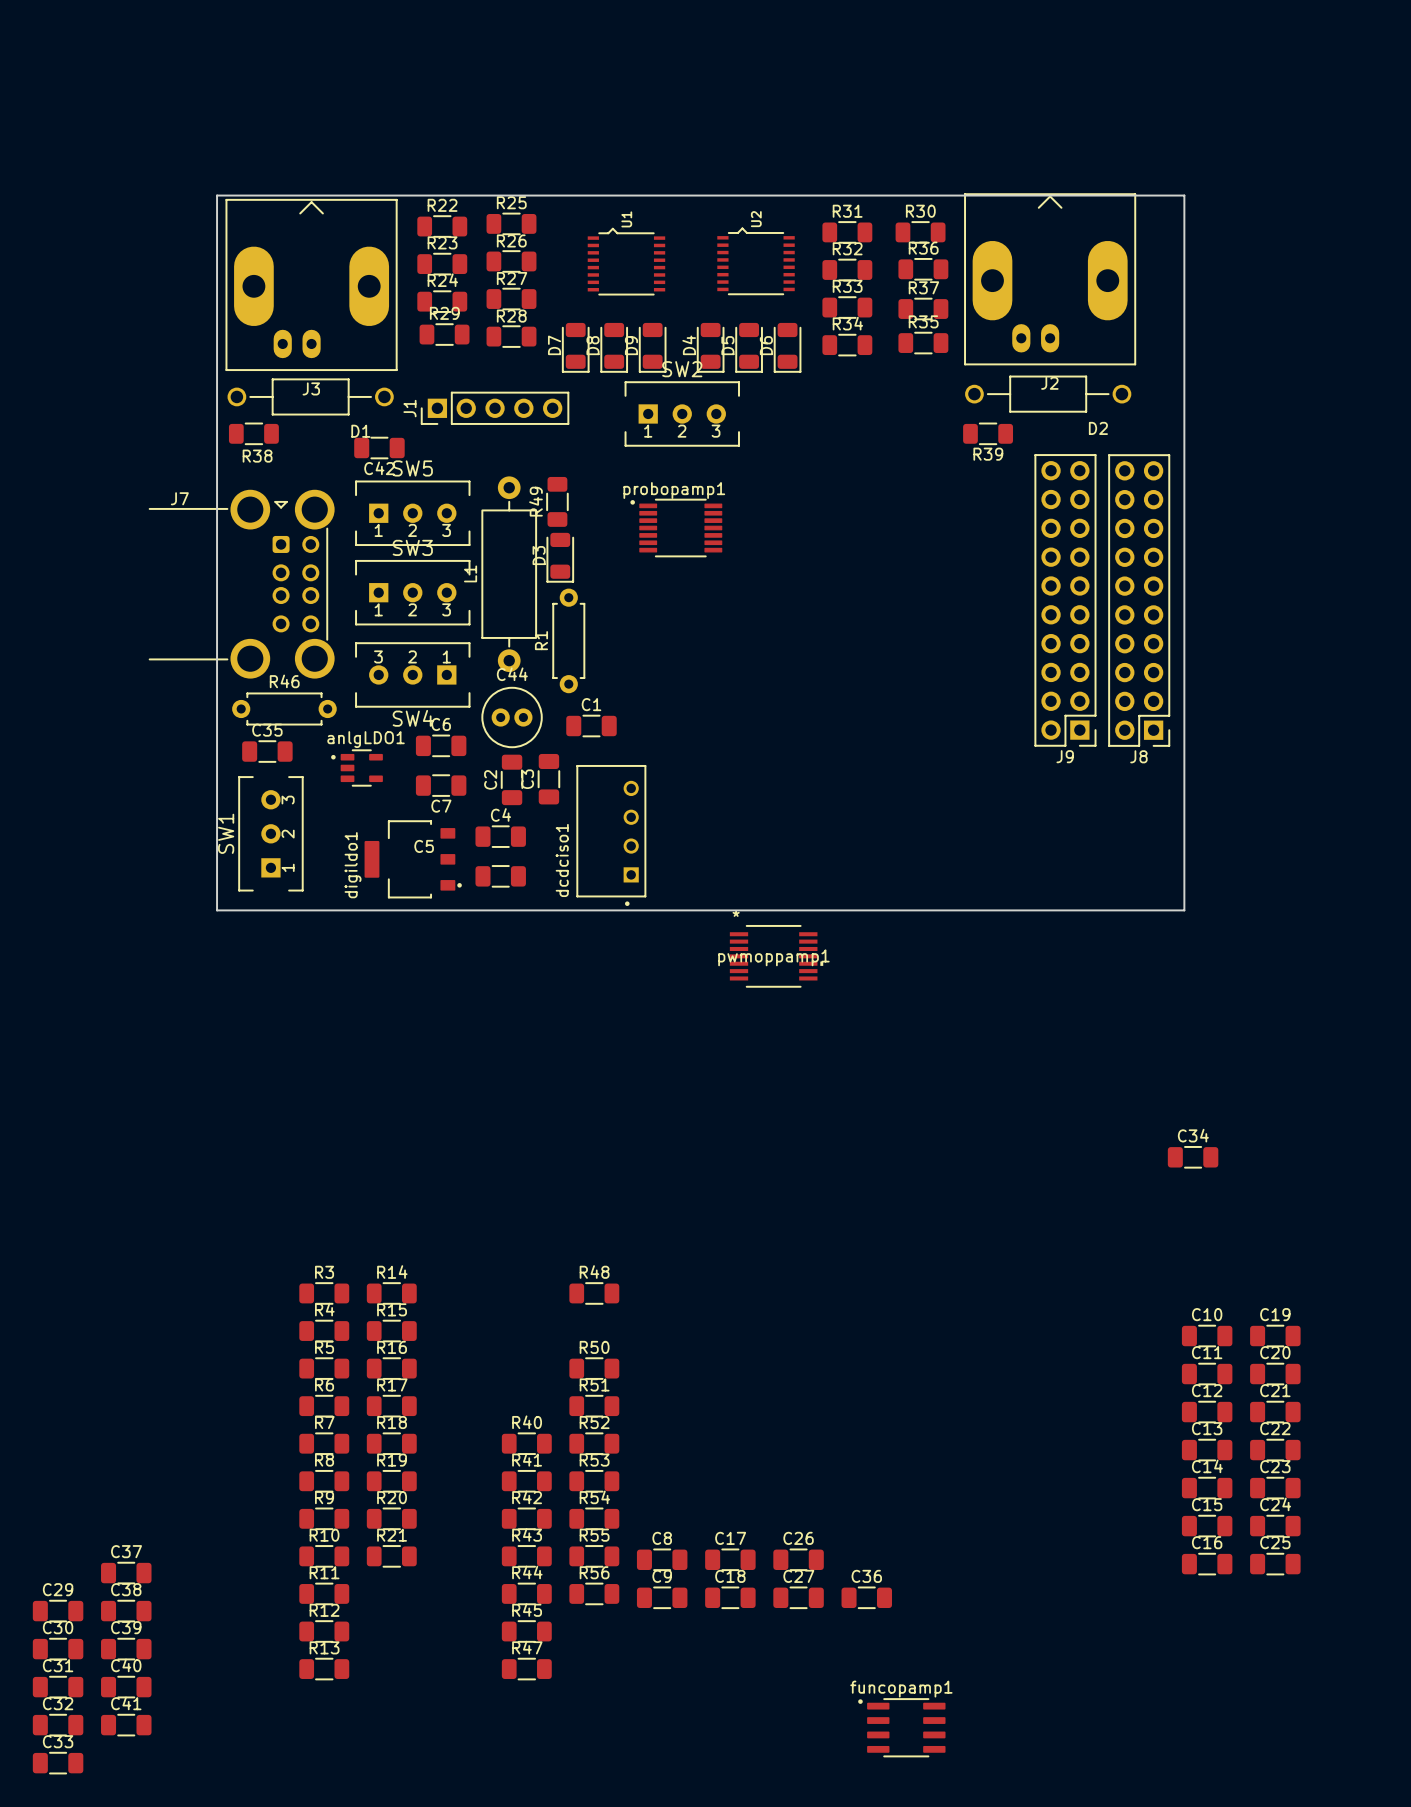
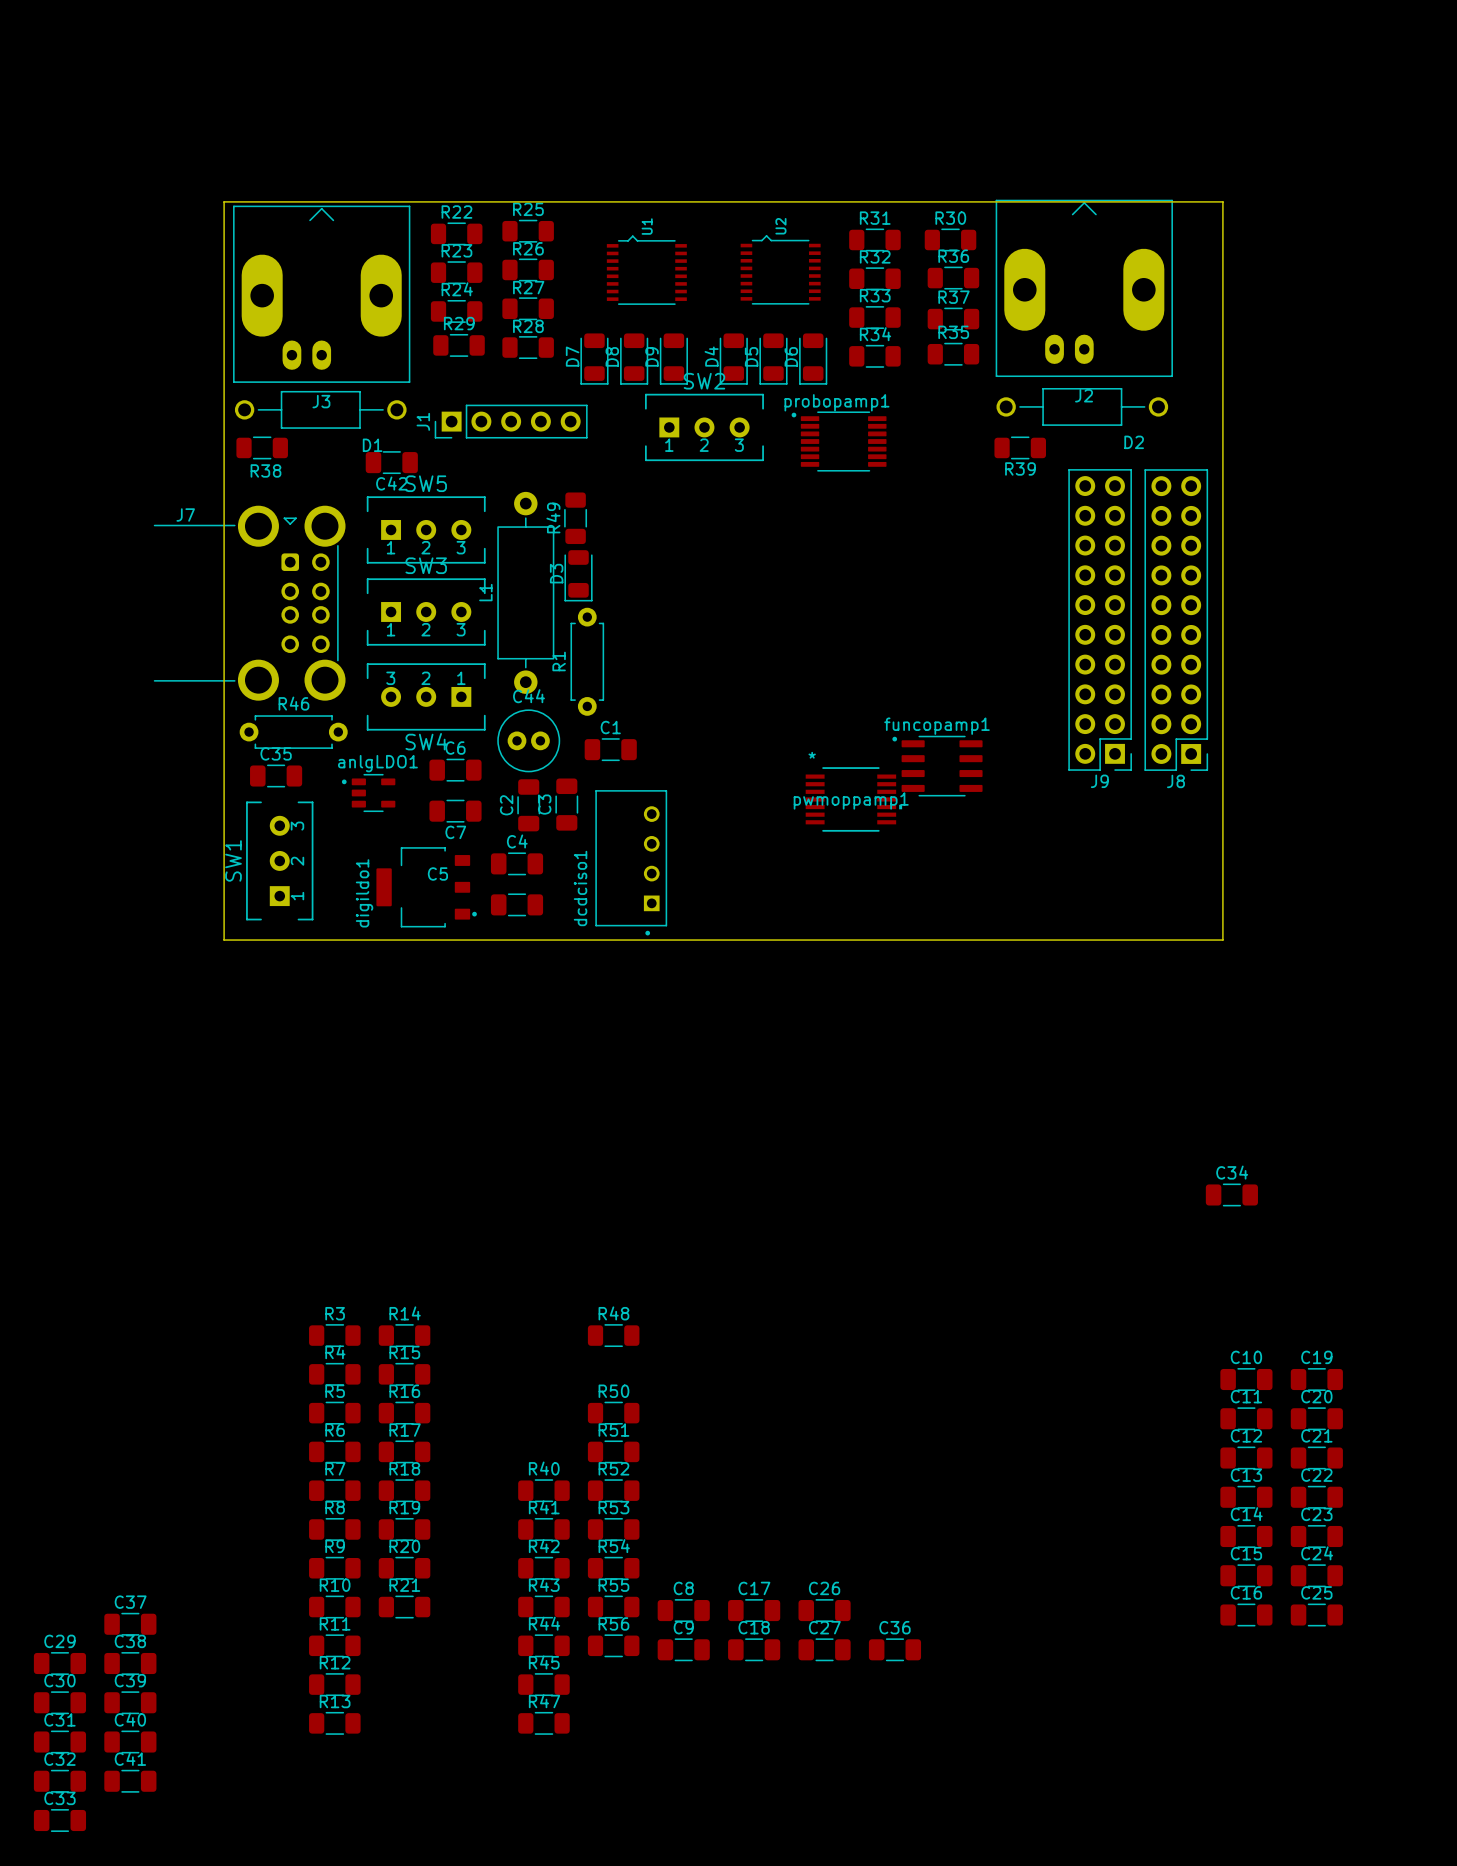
probopamp1 position: (676, 528) -> (839, 441)
pwmoppamp1 position: (776, 956) -> (853, 799)
funcopamp1 position: (901, 1727) -> (937, 766)

